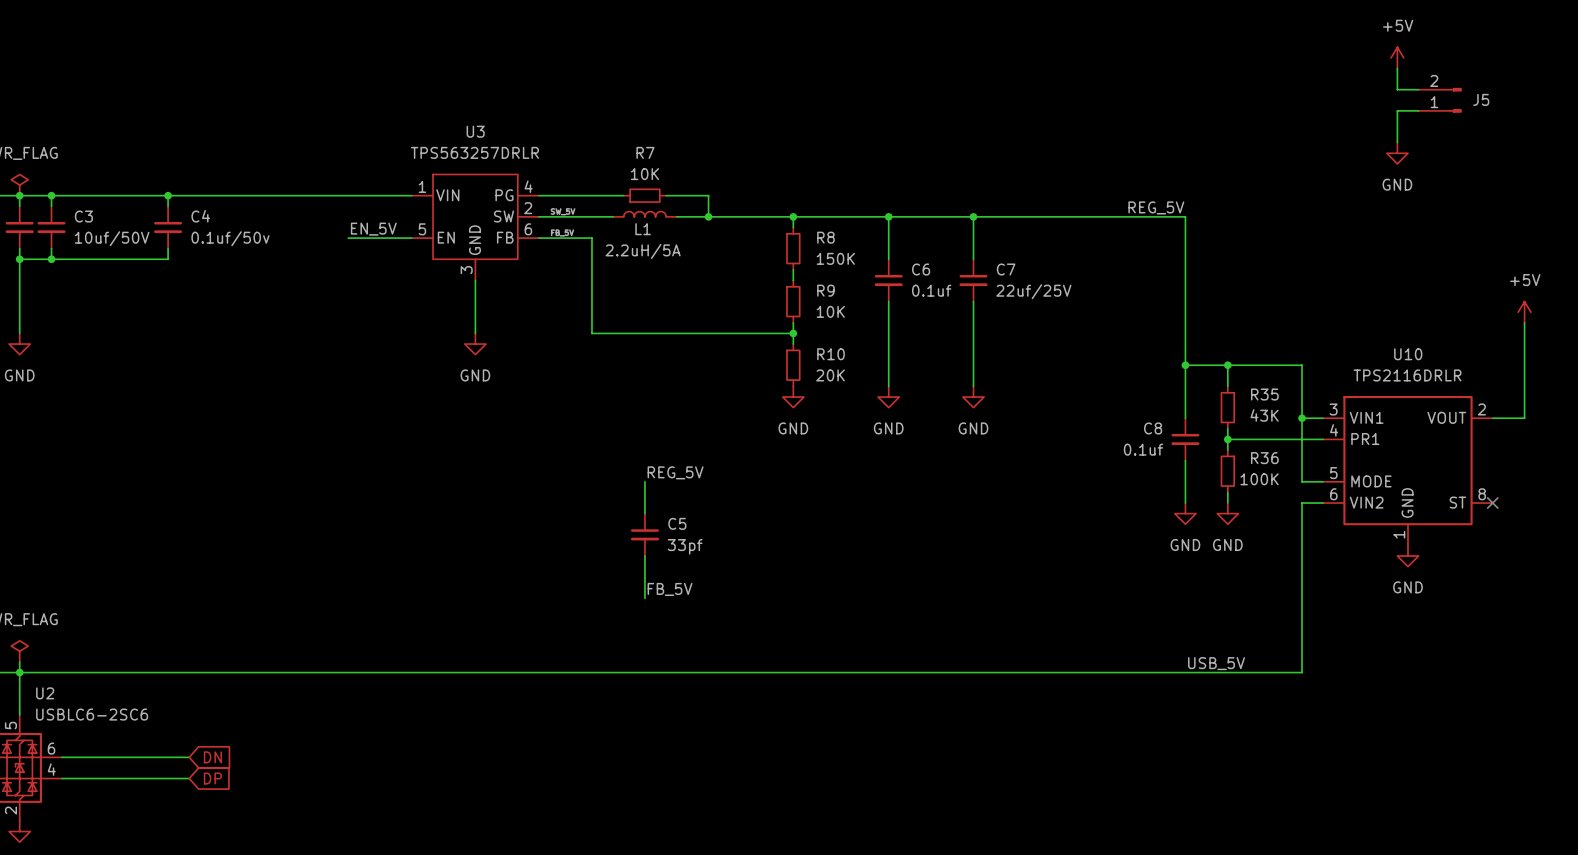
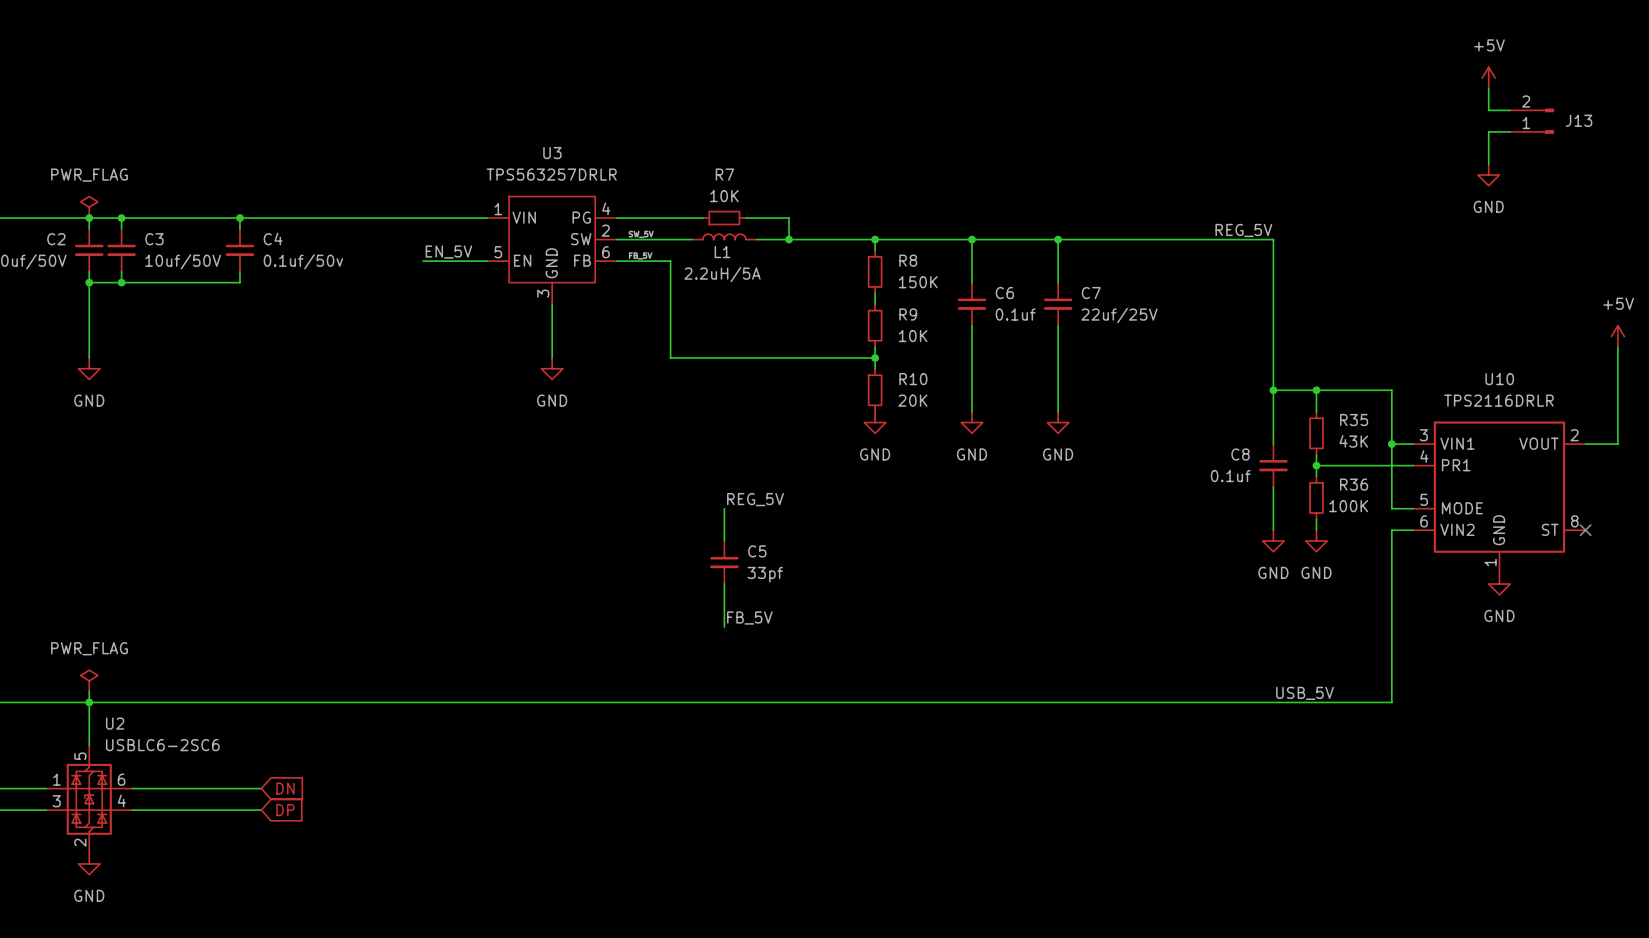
J5 name: J5 (1481, 99) -> J13 (1579, 120)

